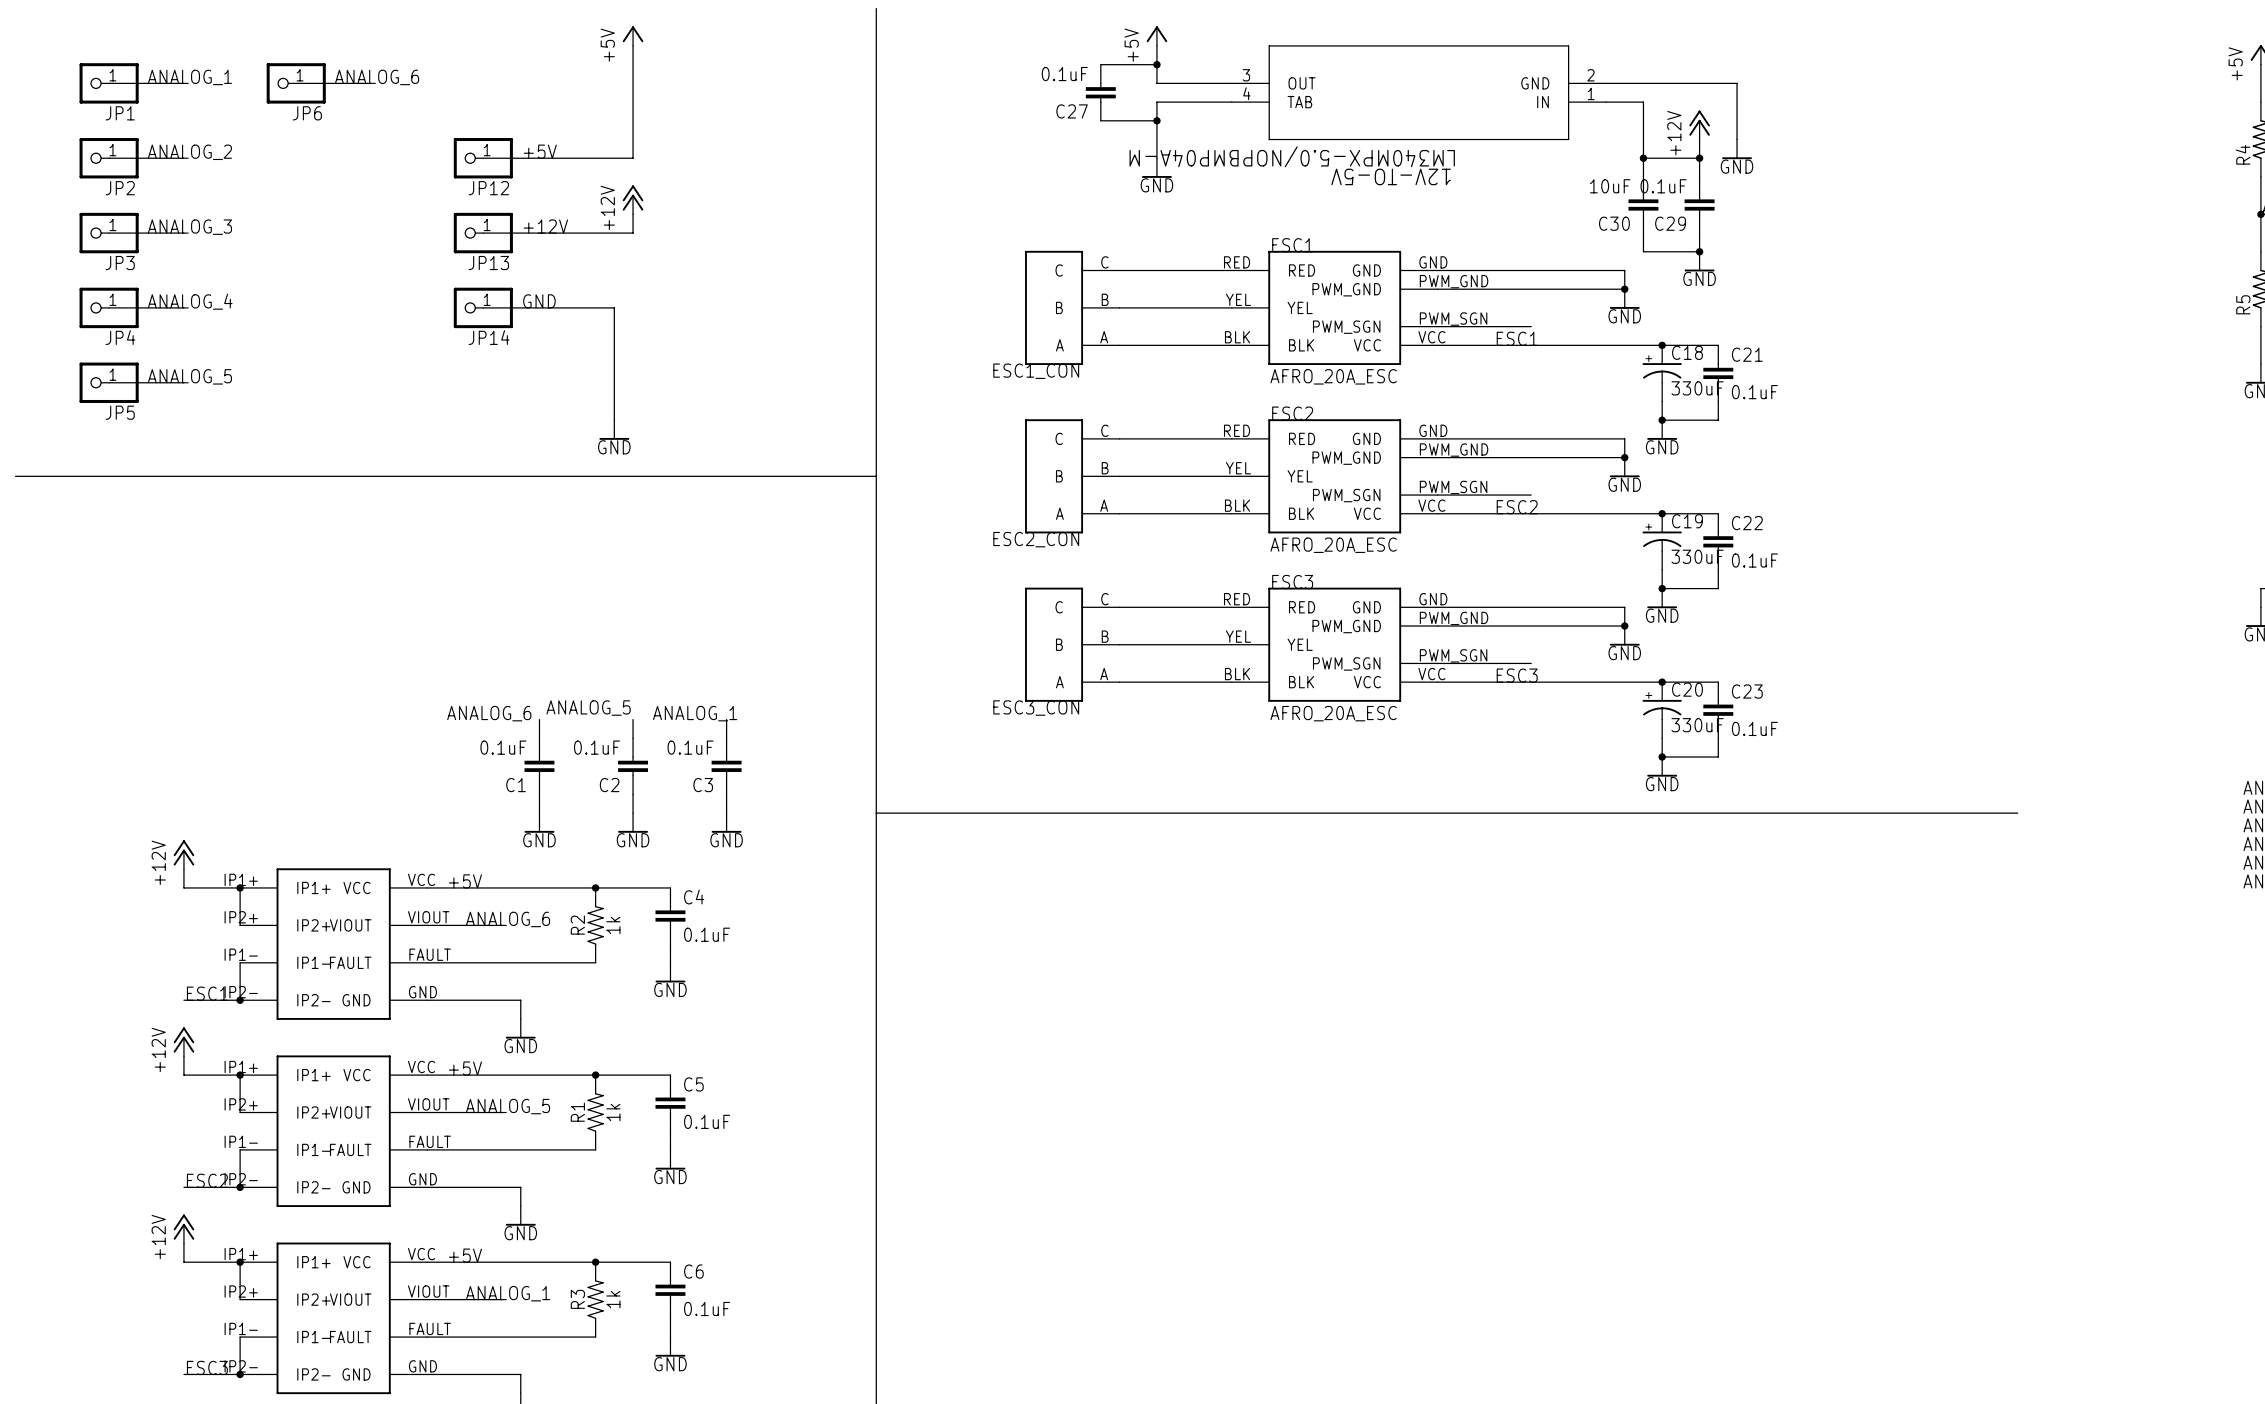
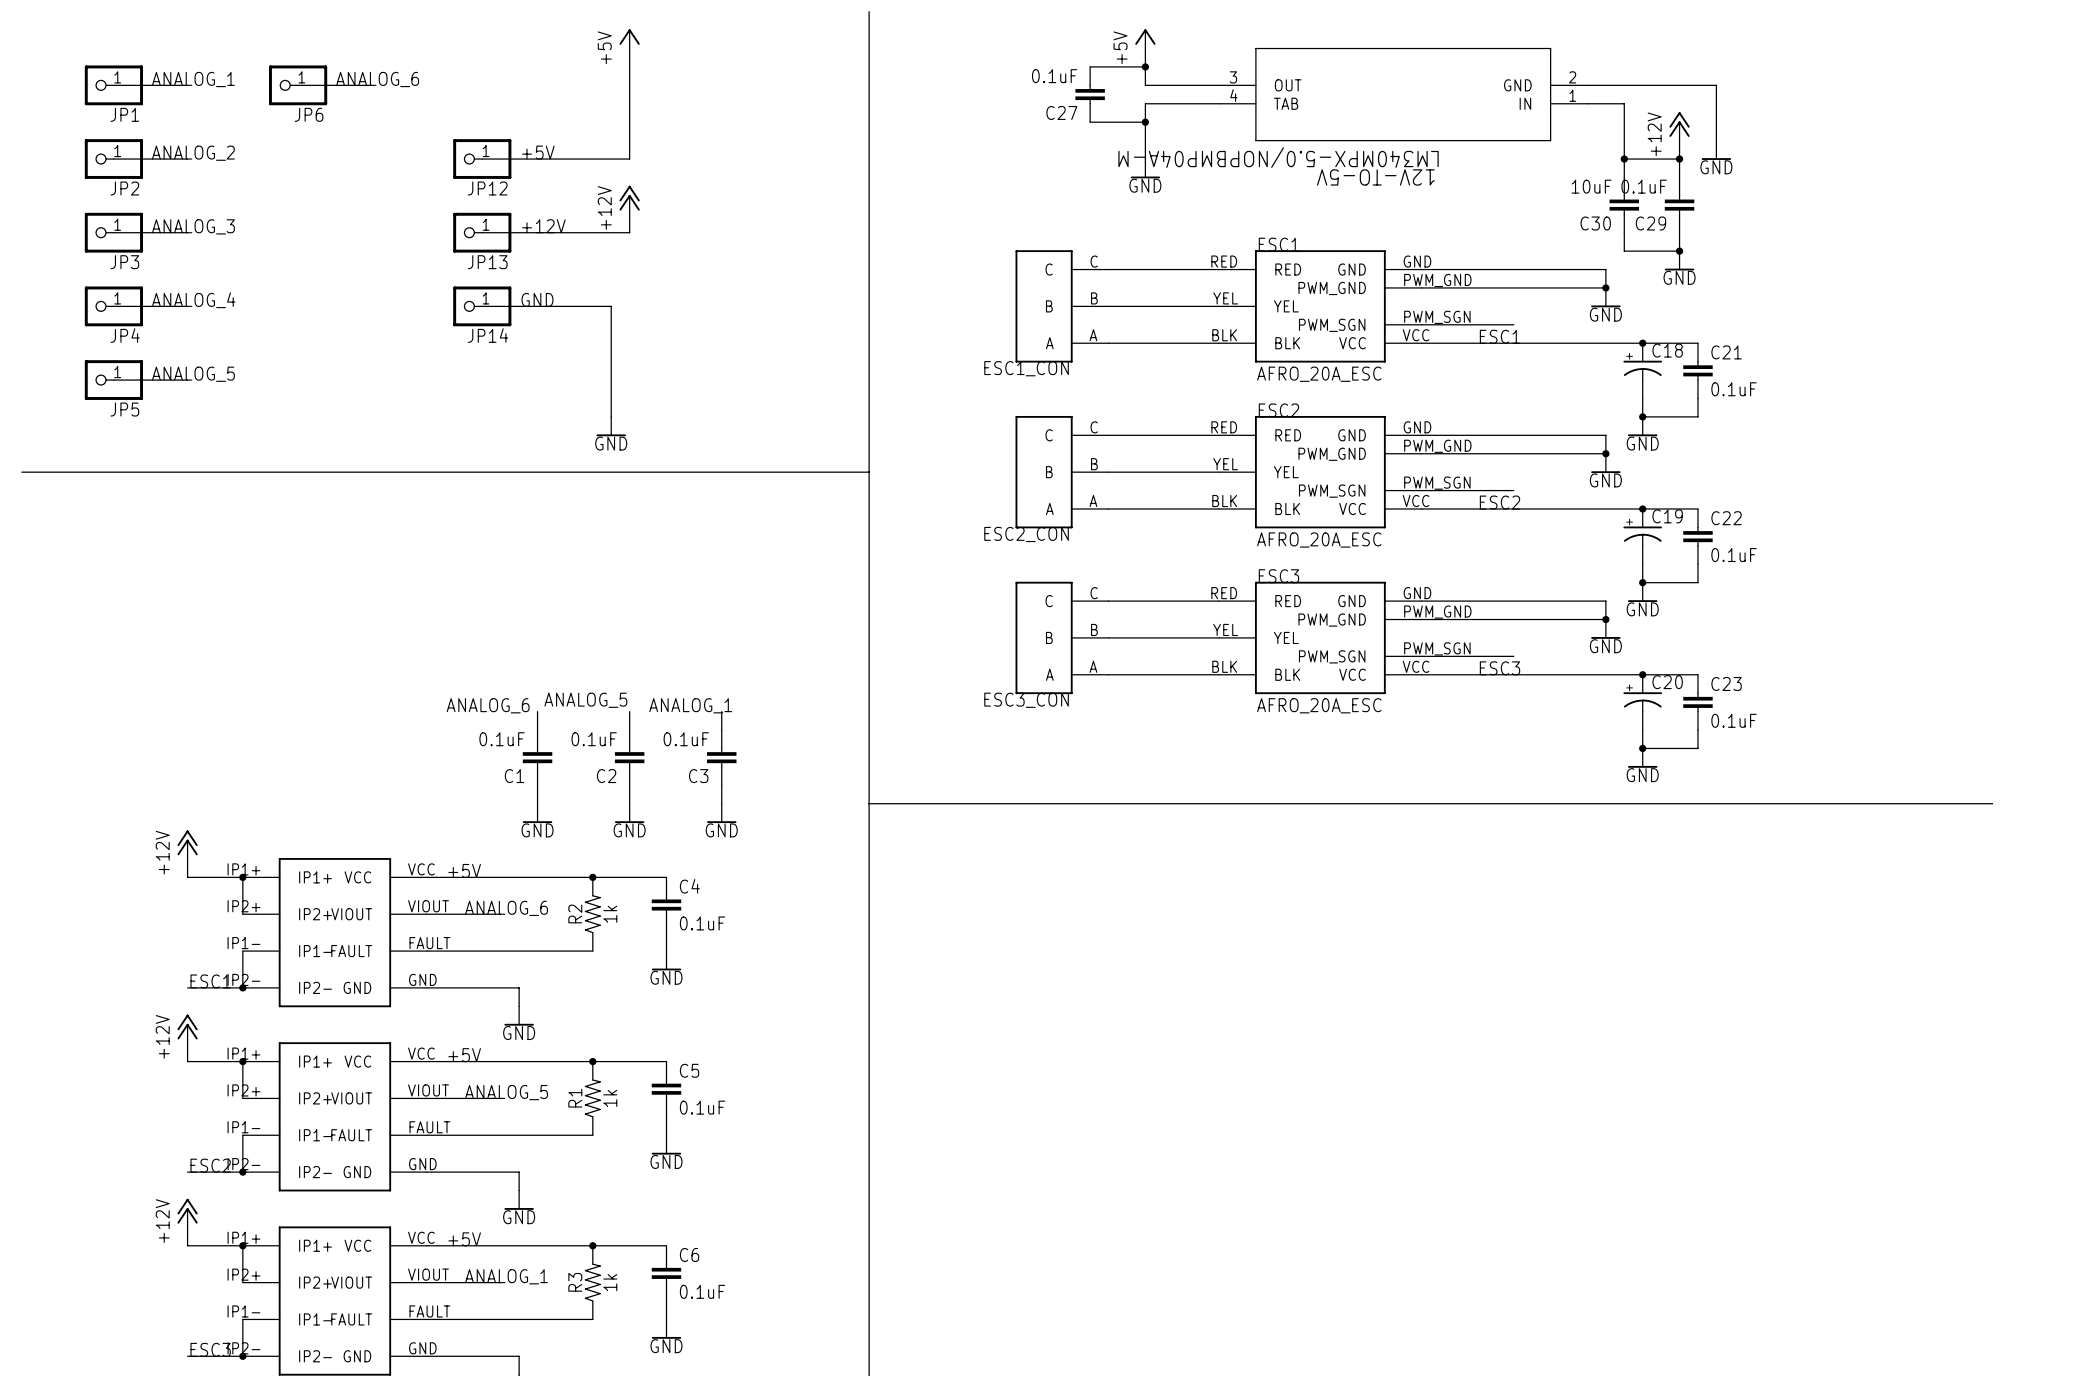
C18 value: 330uF (1697, 388) -> none
C19 value: 330uF (1697, 556) -> none
C20 value: 330uF (1697, 725) -> none

